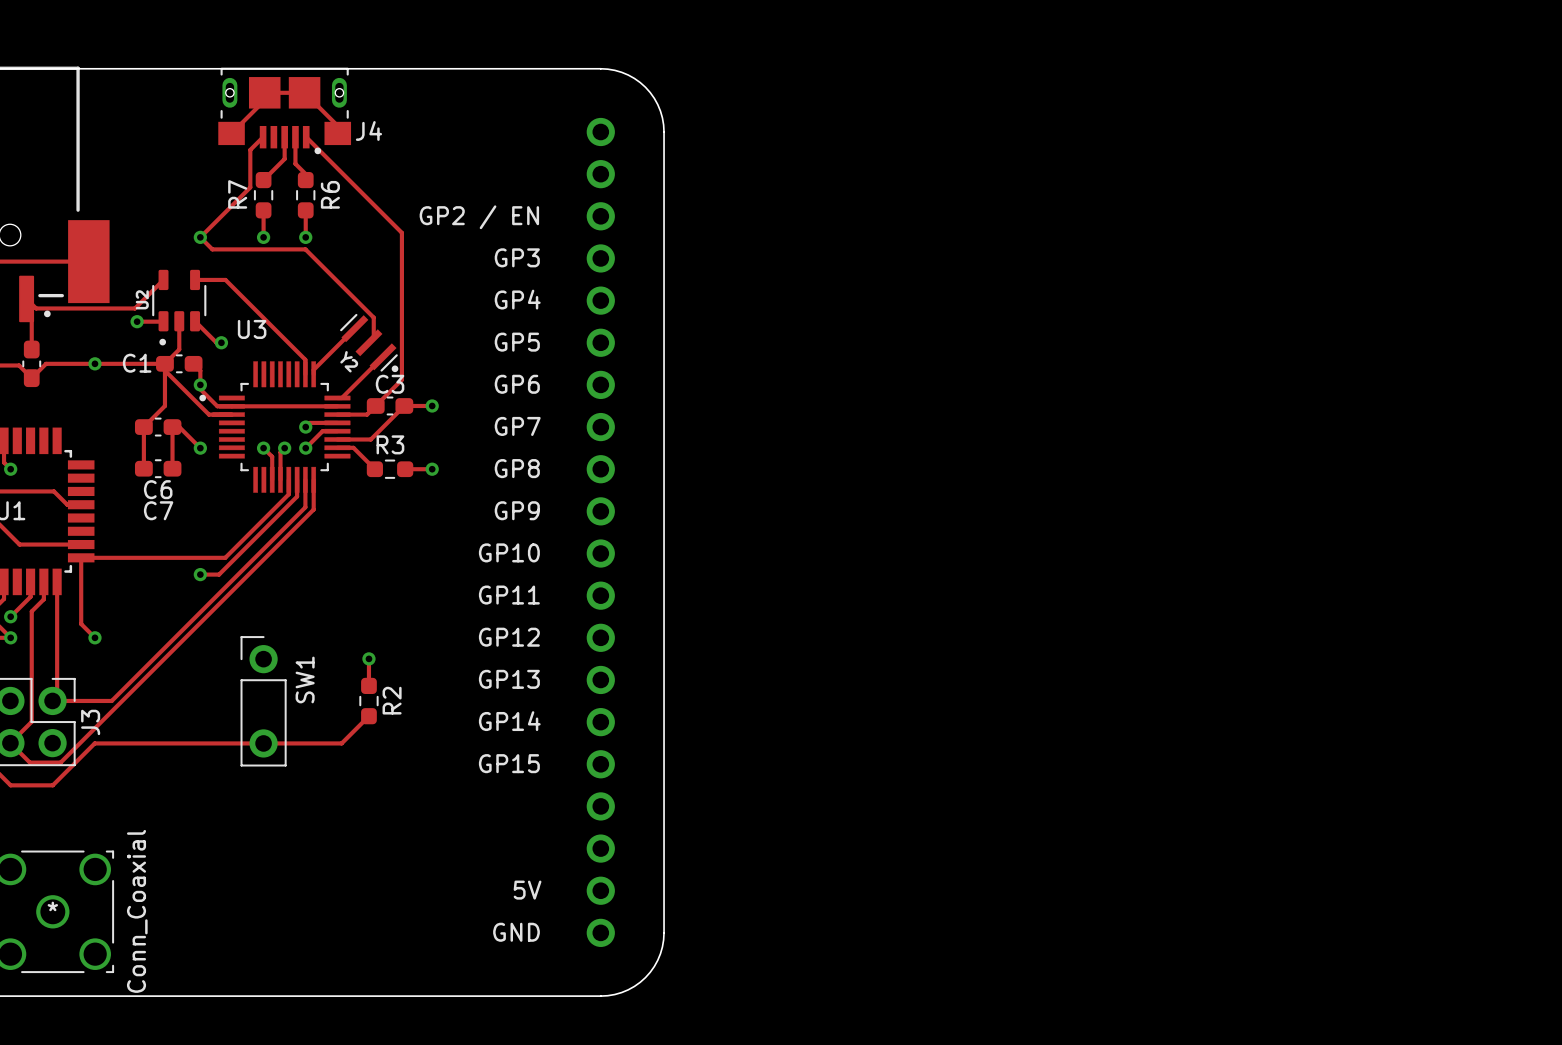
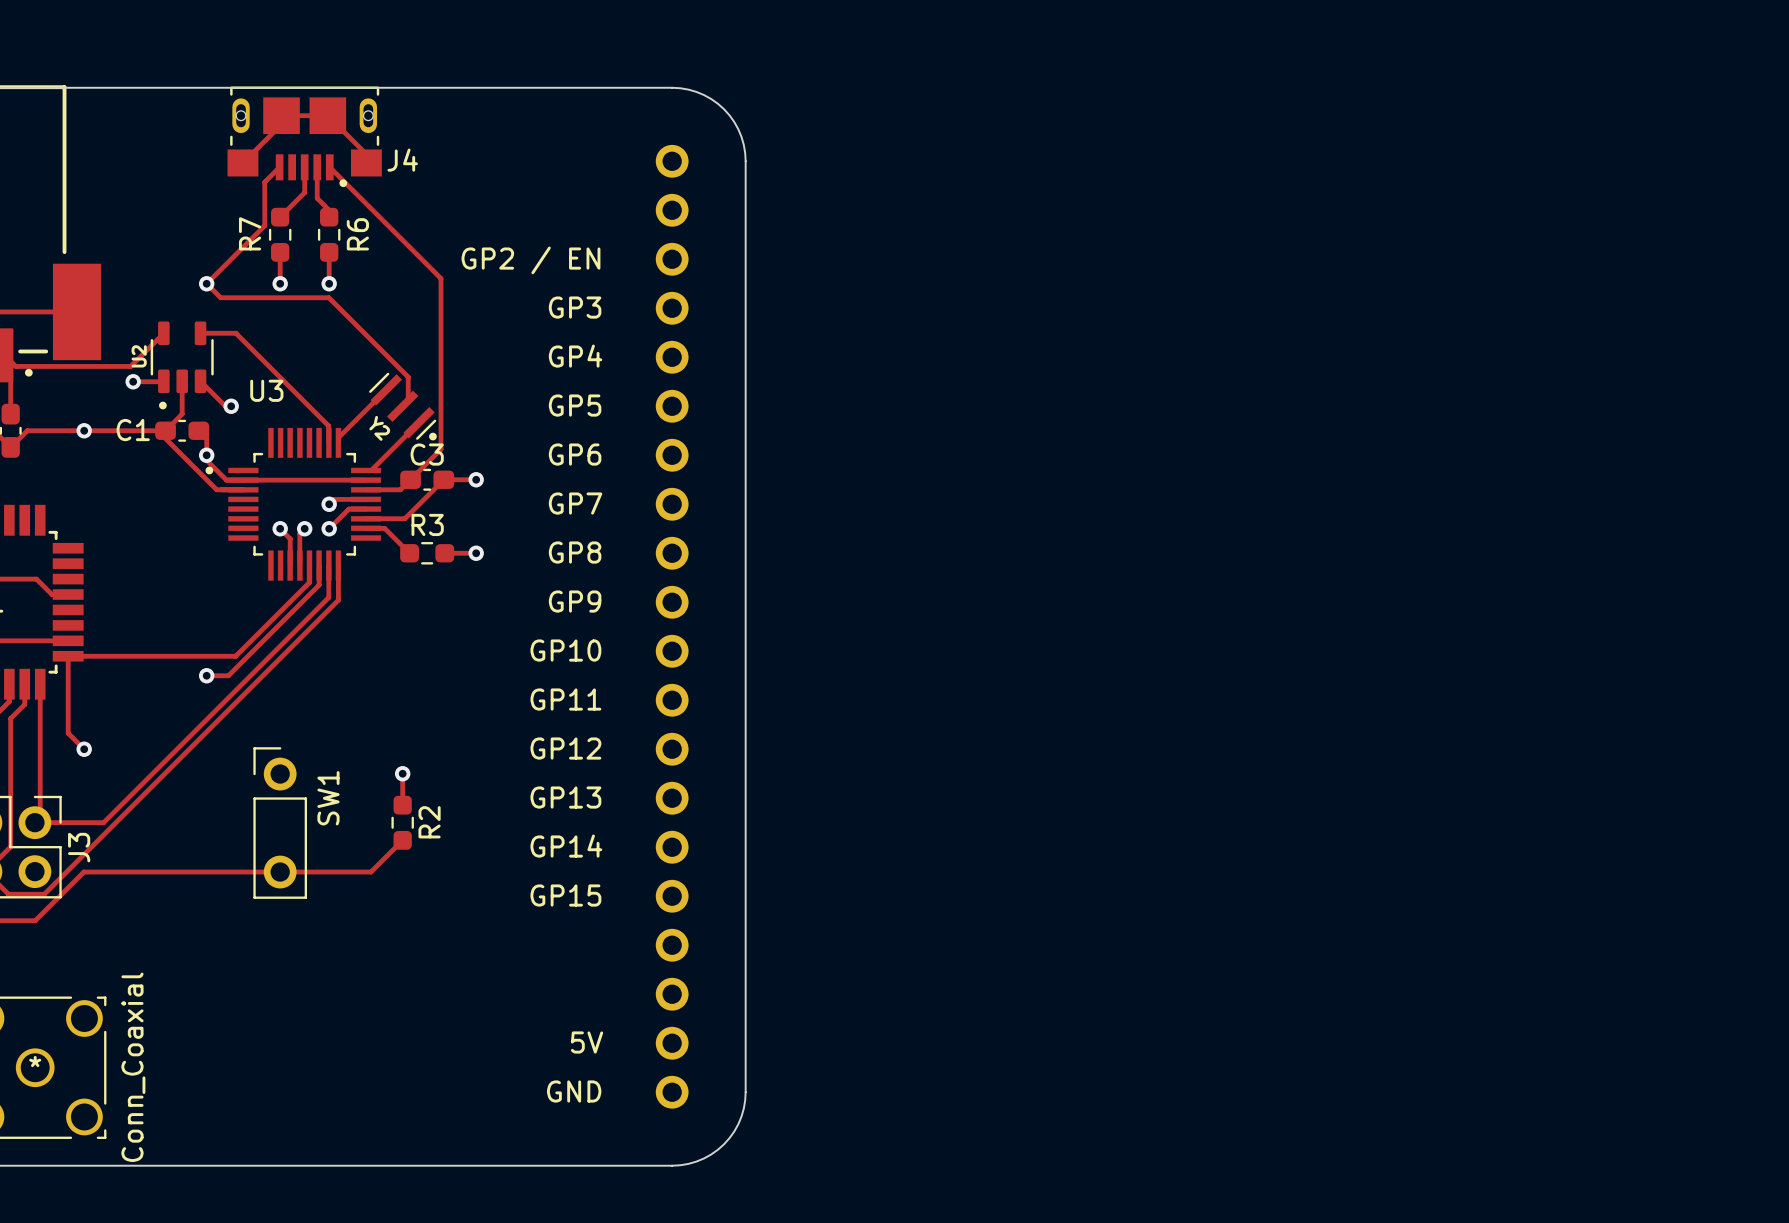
track: (164, 363) (164, 405) (143, 427) (143, 468) -> none
C6: (158, 427) -> none
track: (200, 448) (179, 427) (172, 427) (172, 468) -> none
via: (200, 448) -> none
C7: (158, 468) -> none

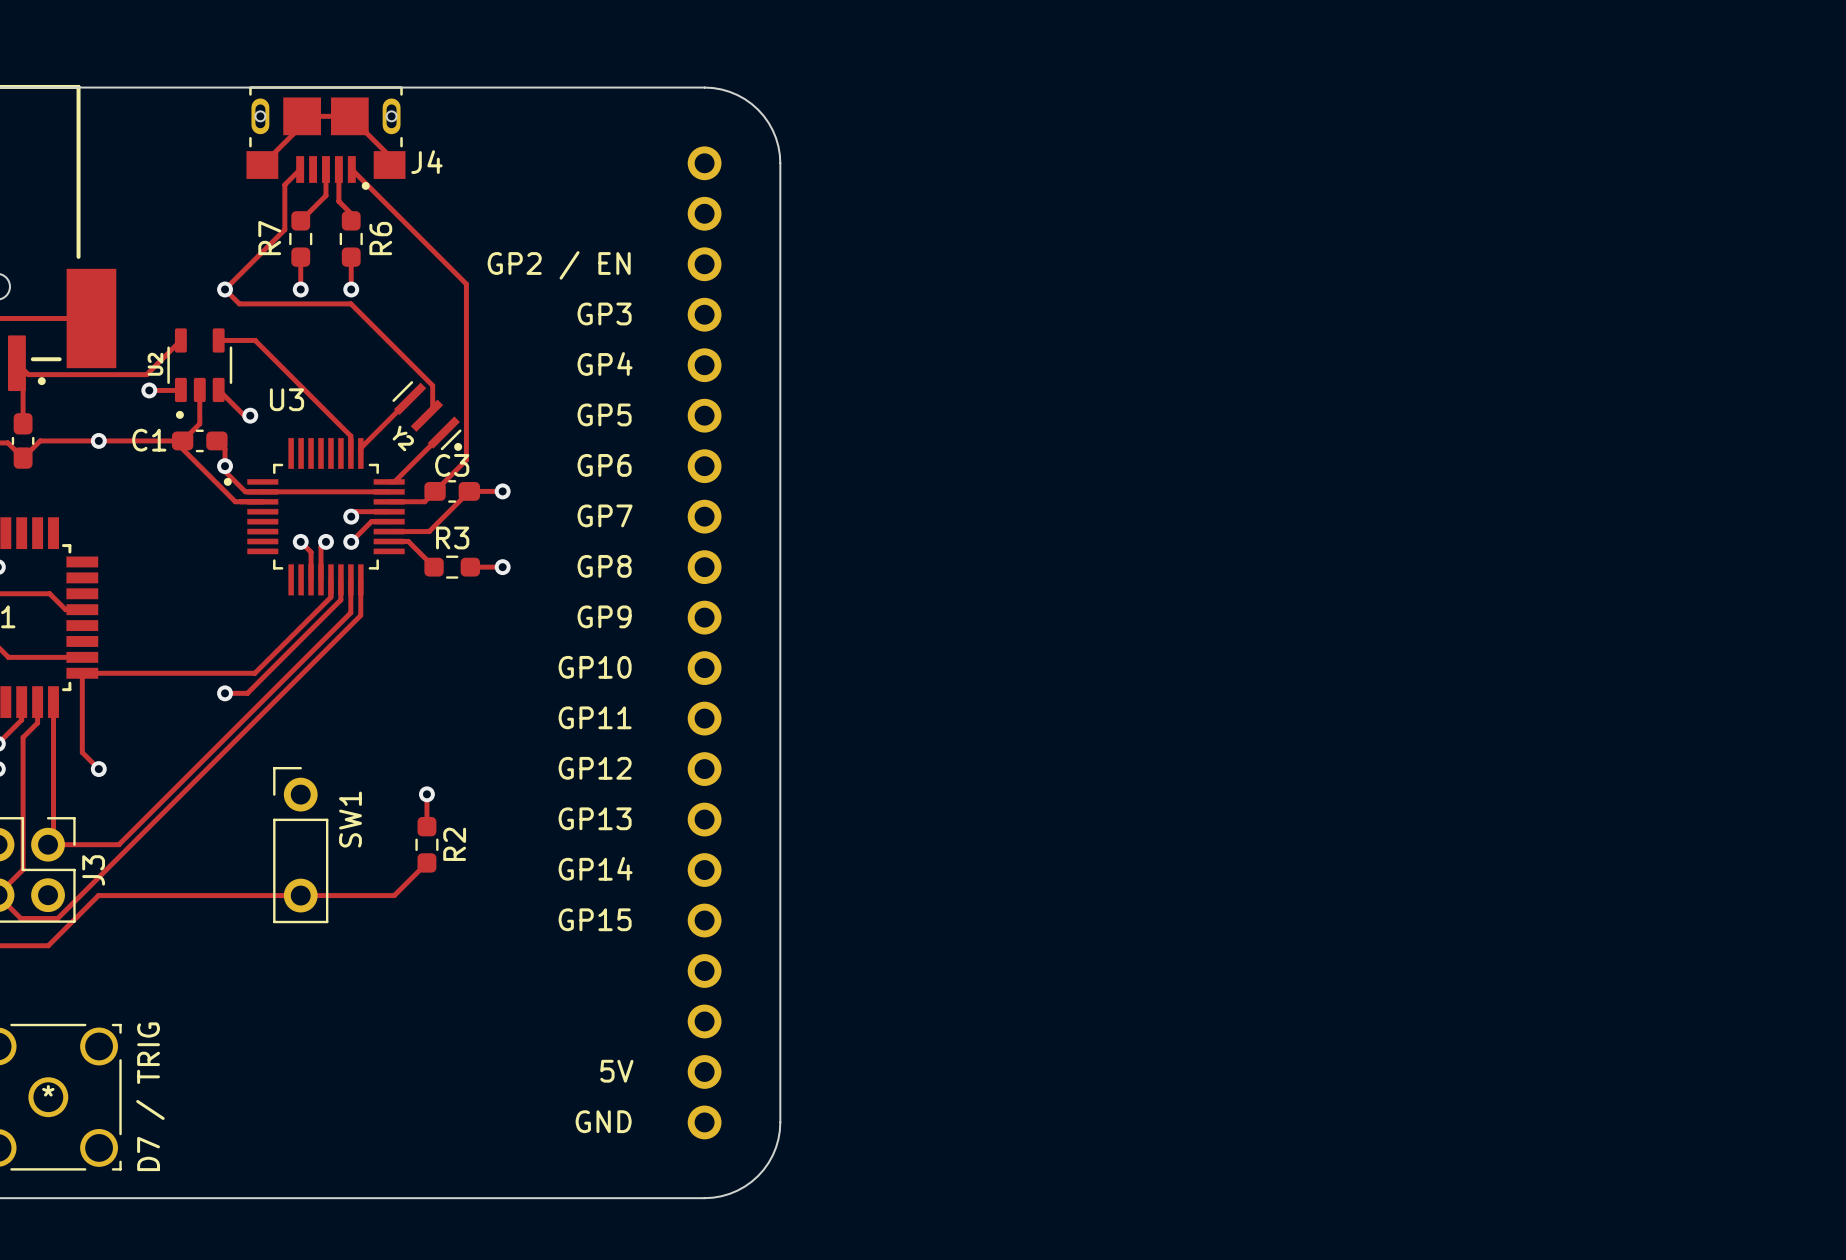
part value: Conn_Coaxial (133, 1067) -> D7 / TRIG (150, 1096)

